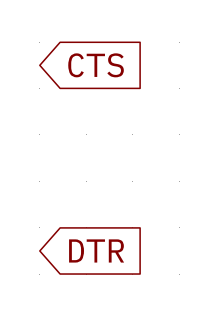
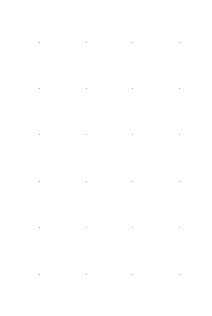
global label: CTS (96, 65) -> none
global label: DTR (96, 250) -> none

